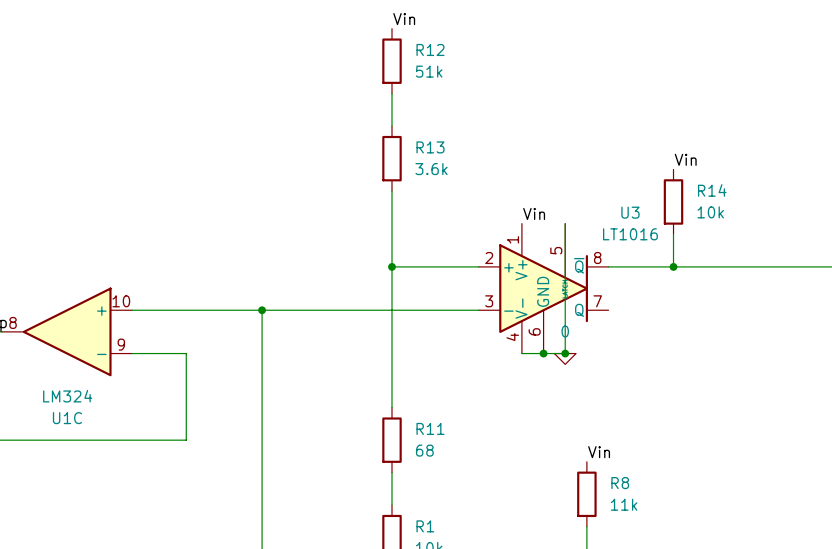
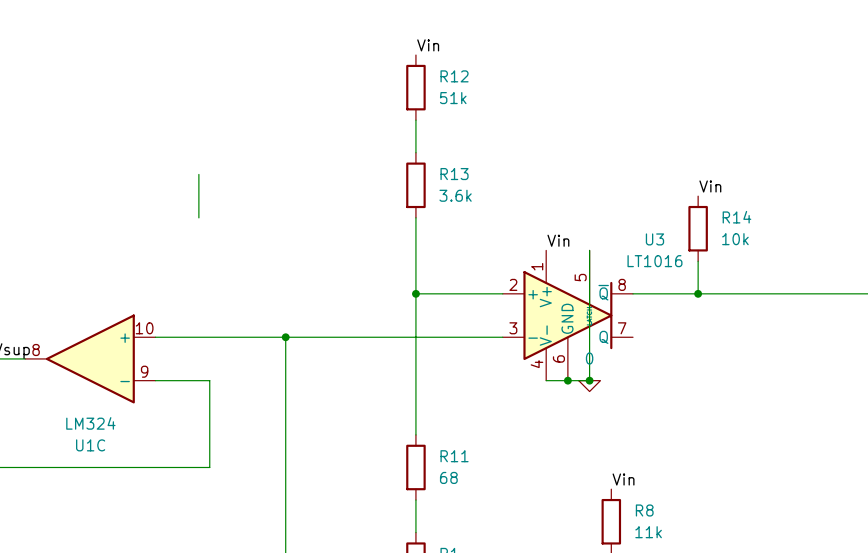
wire: none -> (198, 174) (198, 217)

